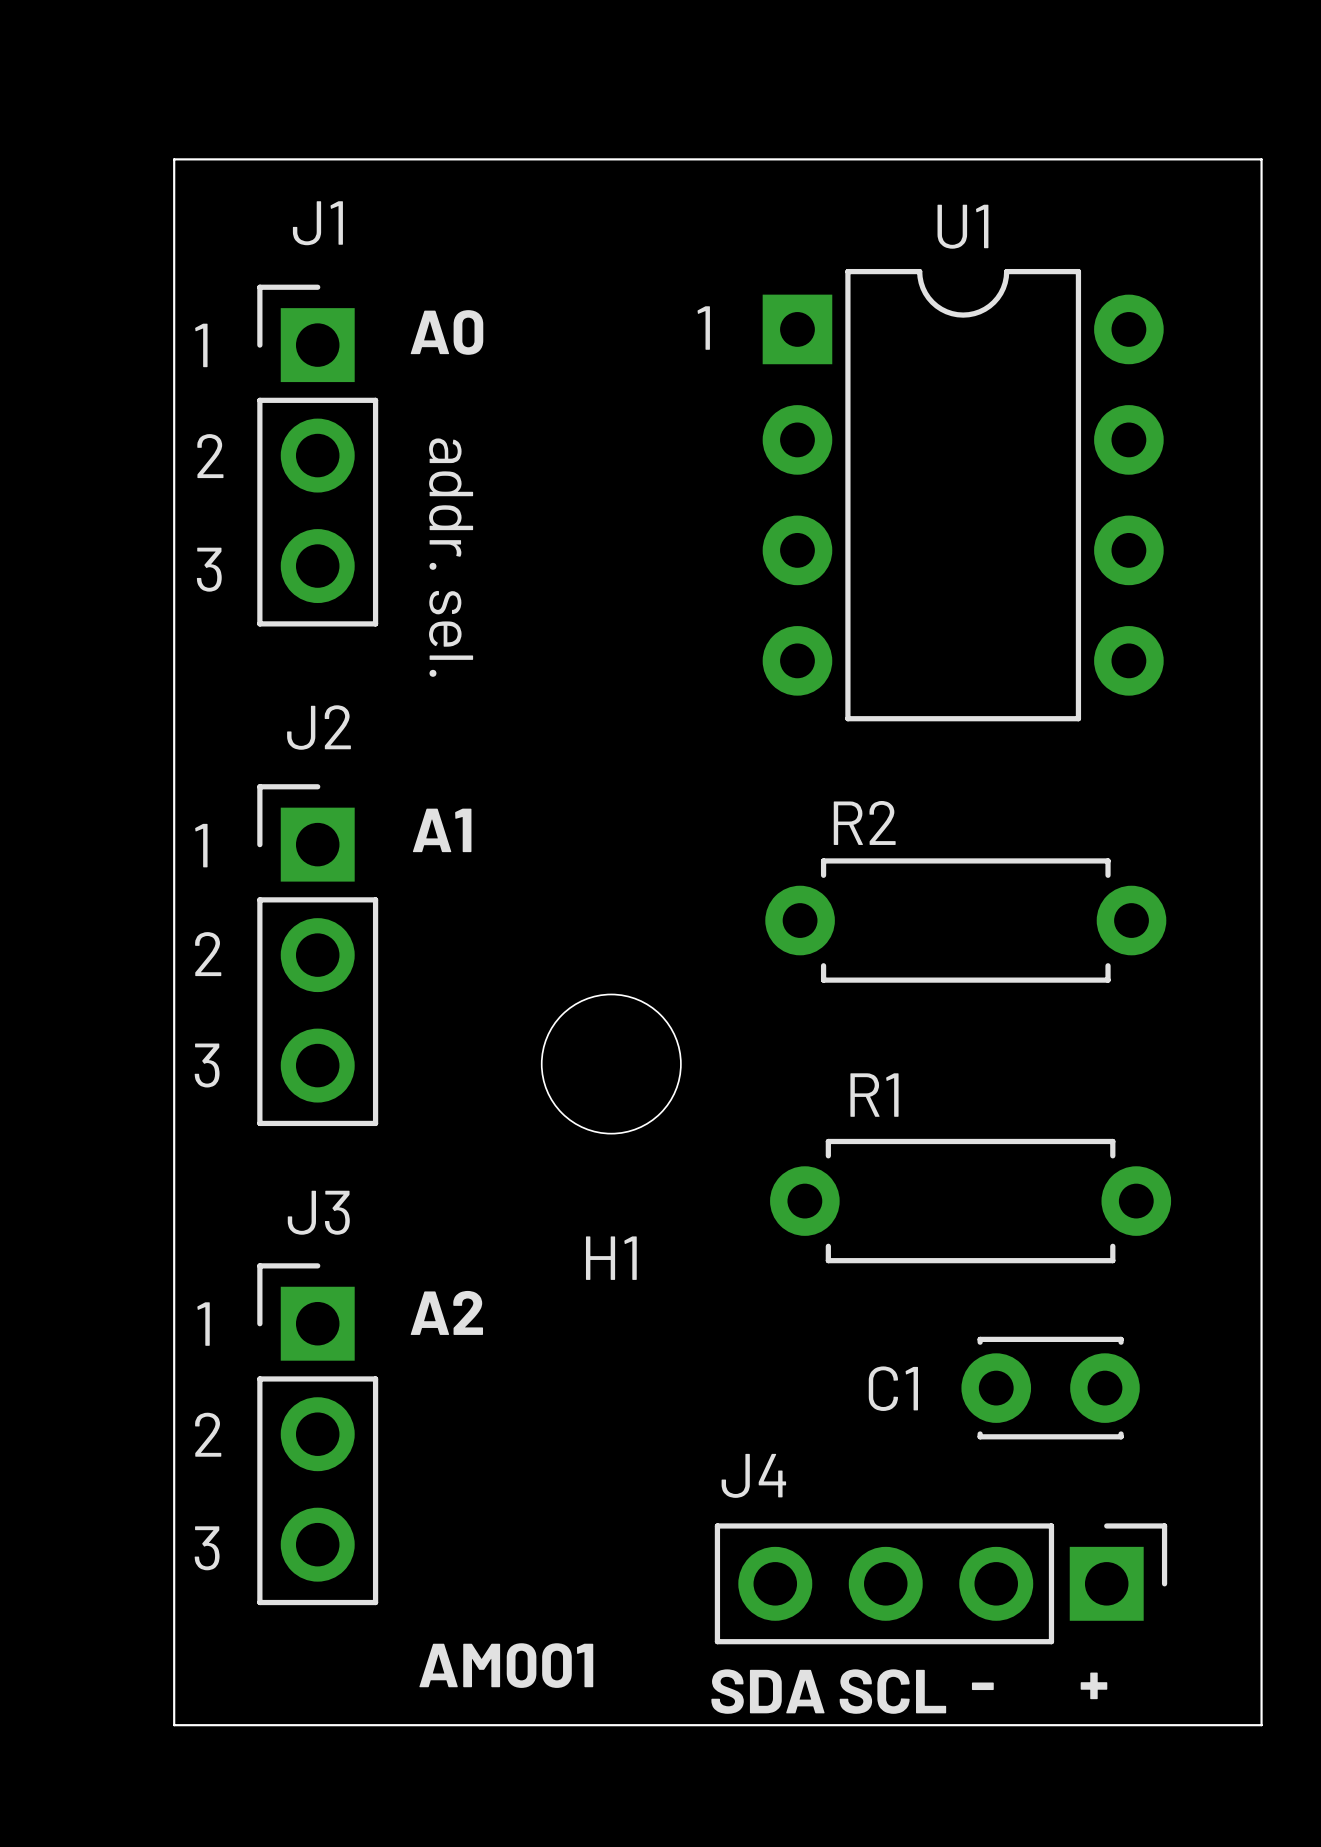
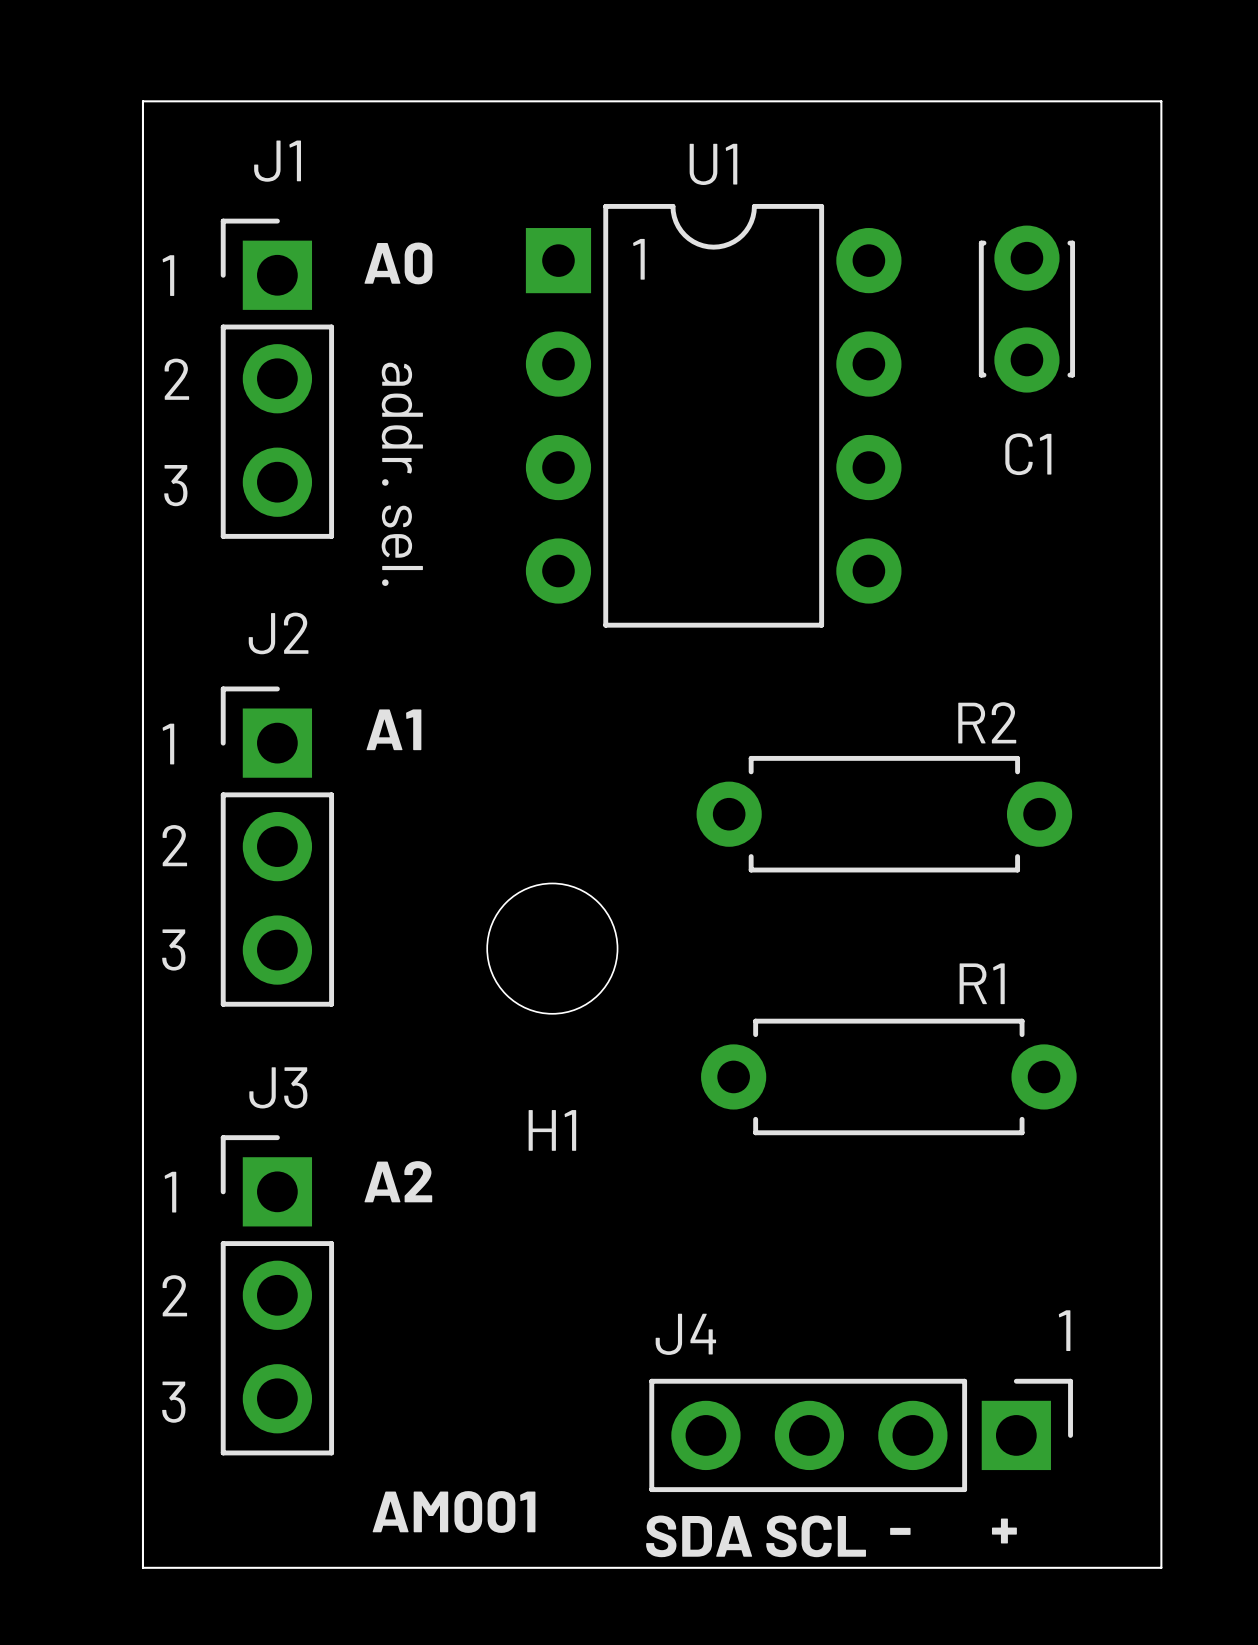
U1 position: (963, 495) -> (713, 415)
R2 name position: R2 (864, 822) -> R2 (987, 722)
R1 name position: R1 (874, 1095) -> R1 (982, 983)
C1 name position: C1 (893, 1388) -> C1 (1028, 454)
C1 rotation: 0° (1050, 1388) -> 90° clockwise (1026, 309)
C1 position: (1050, 1388) -> (1026, 309)
text: none -> 1 (1064, 1330)

